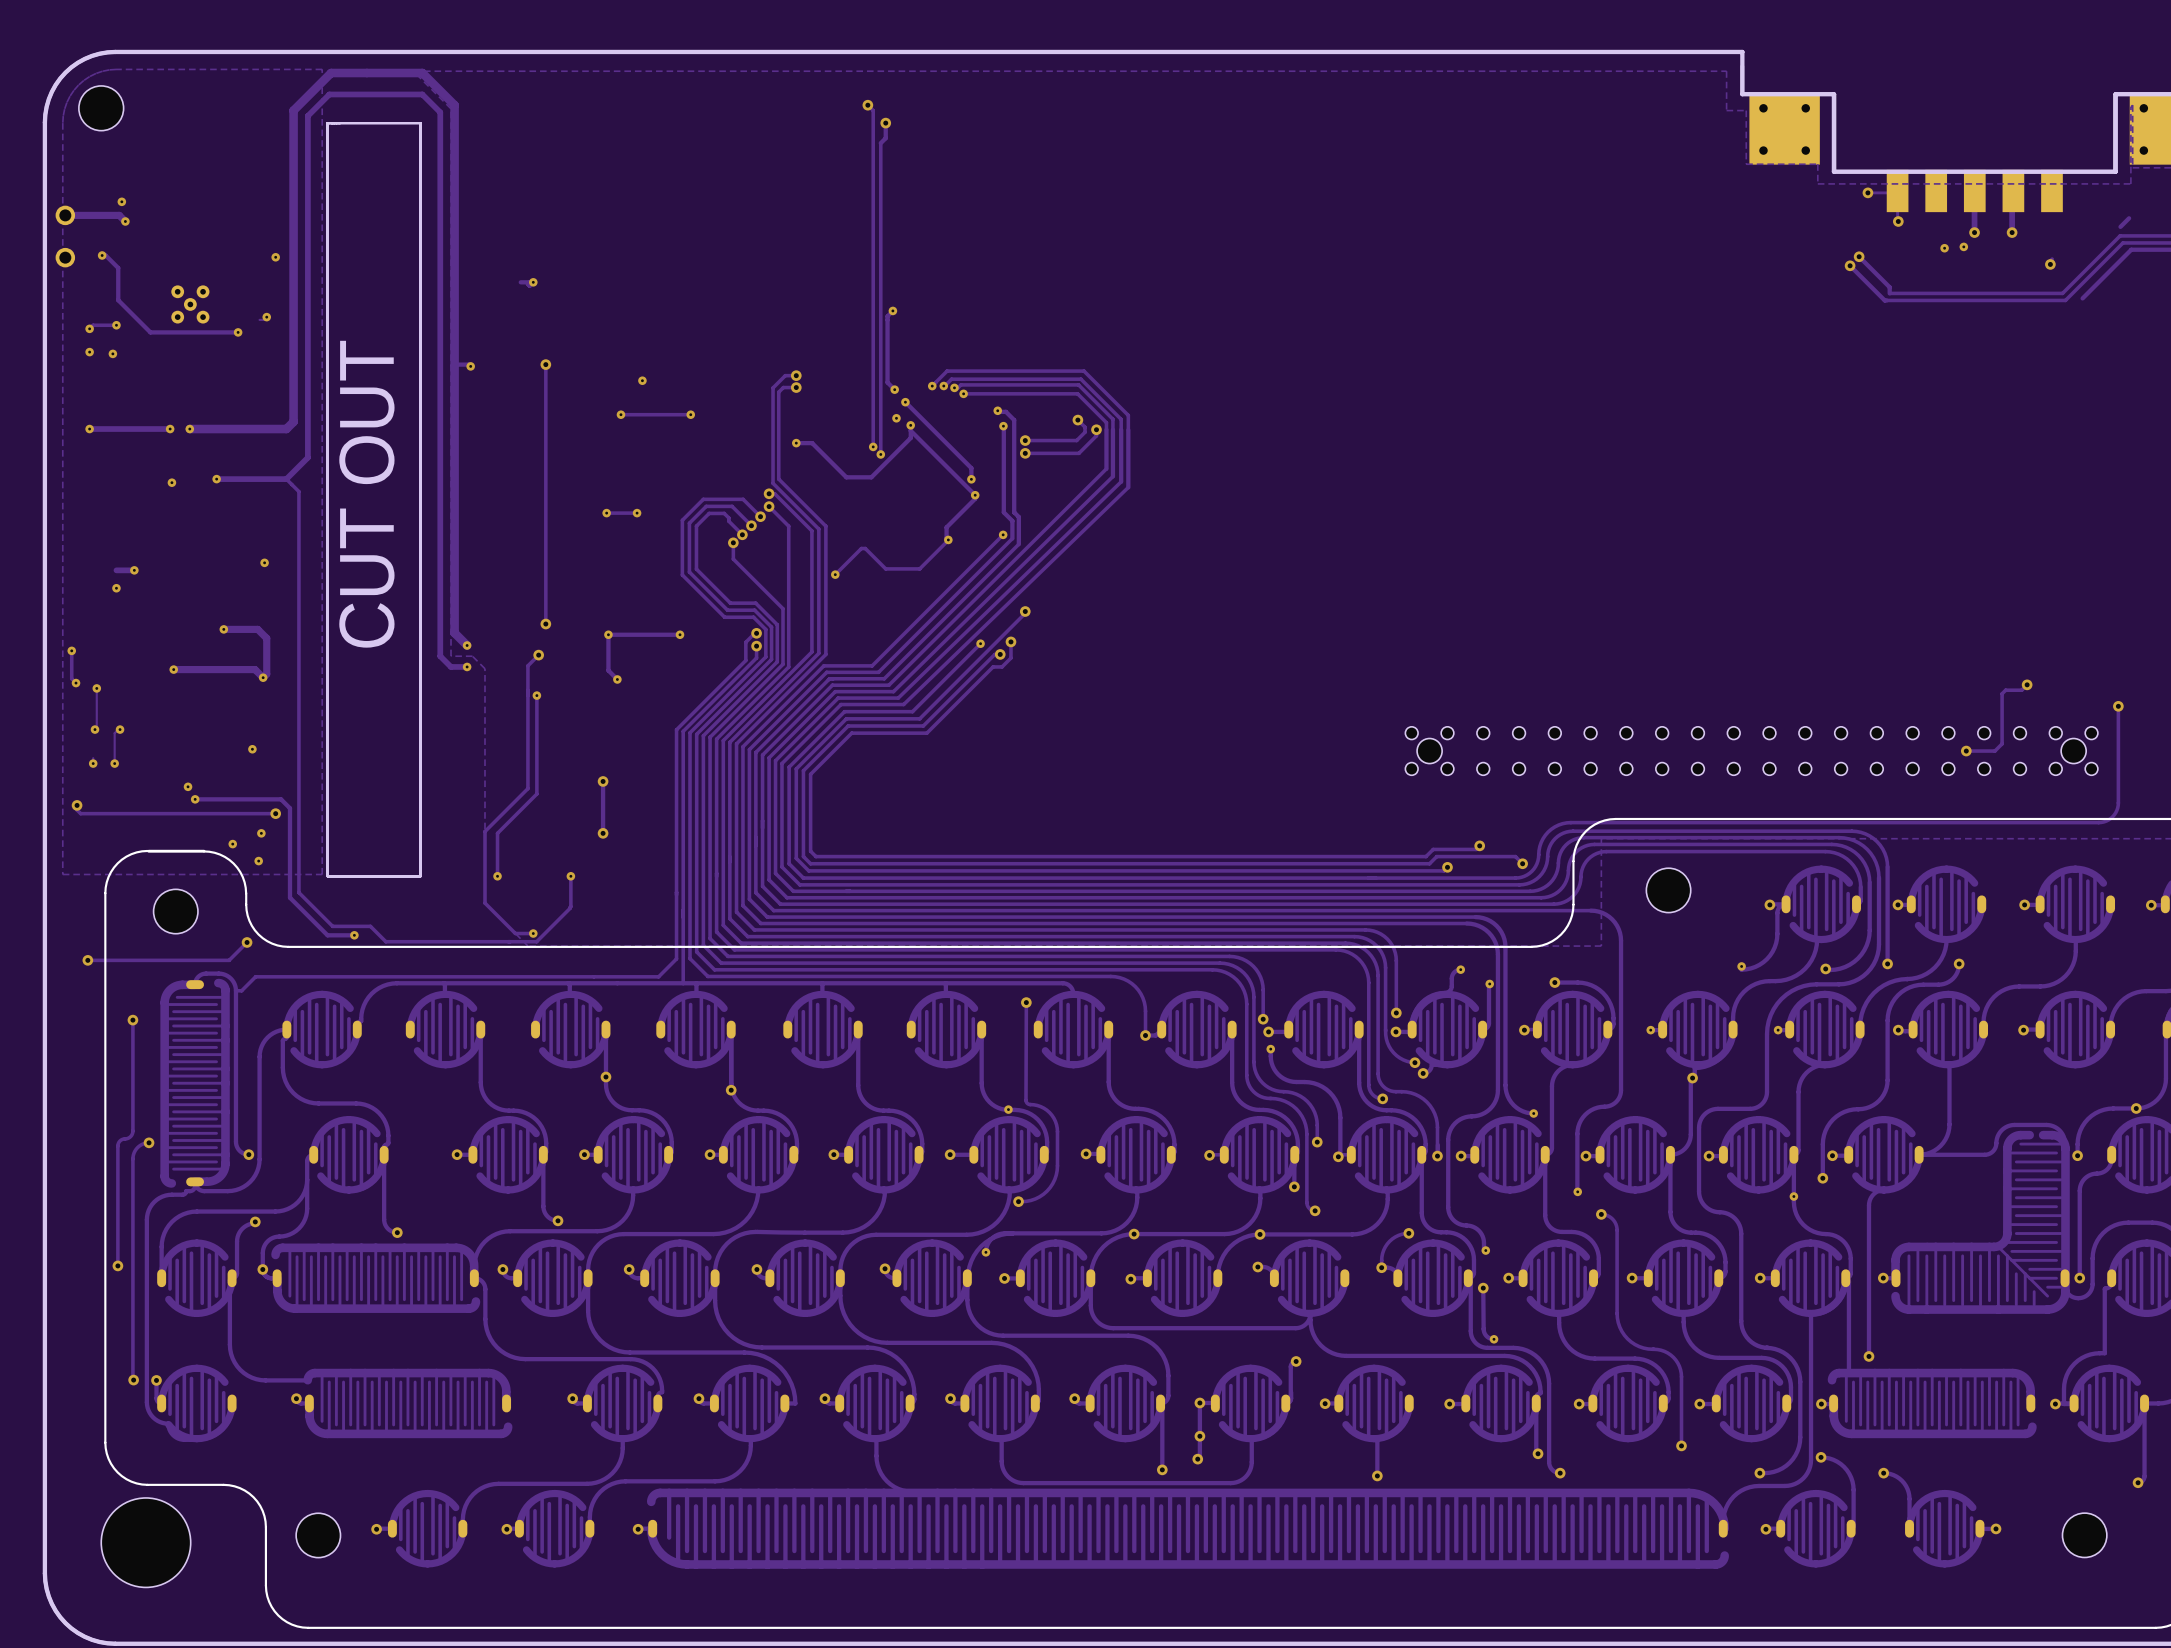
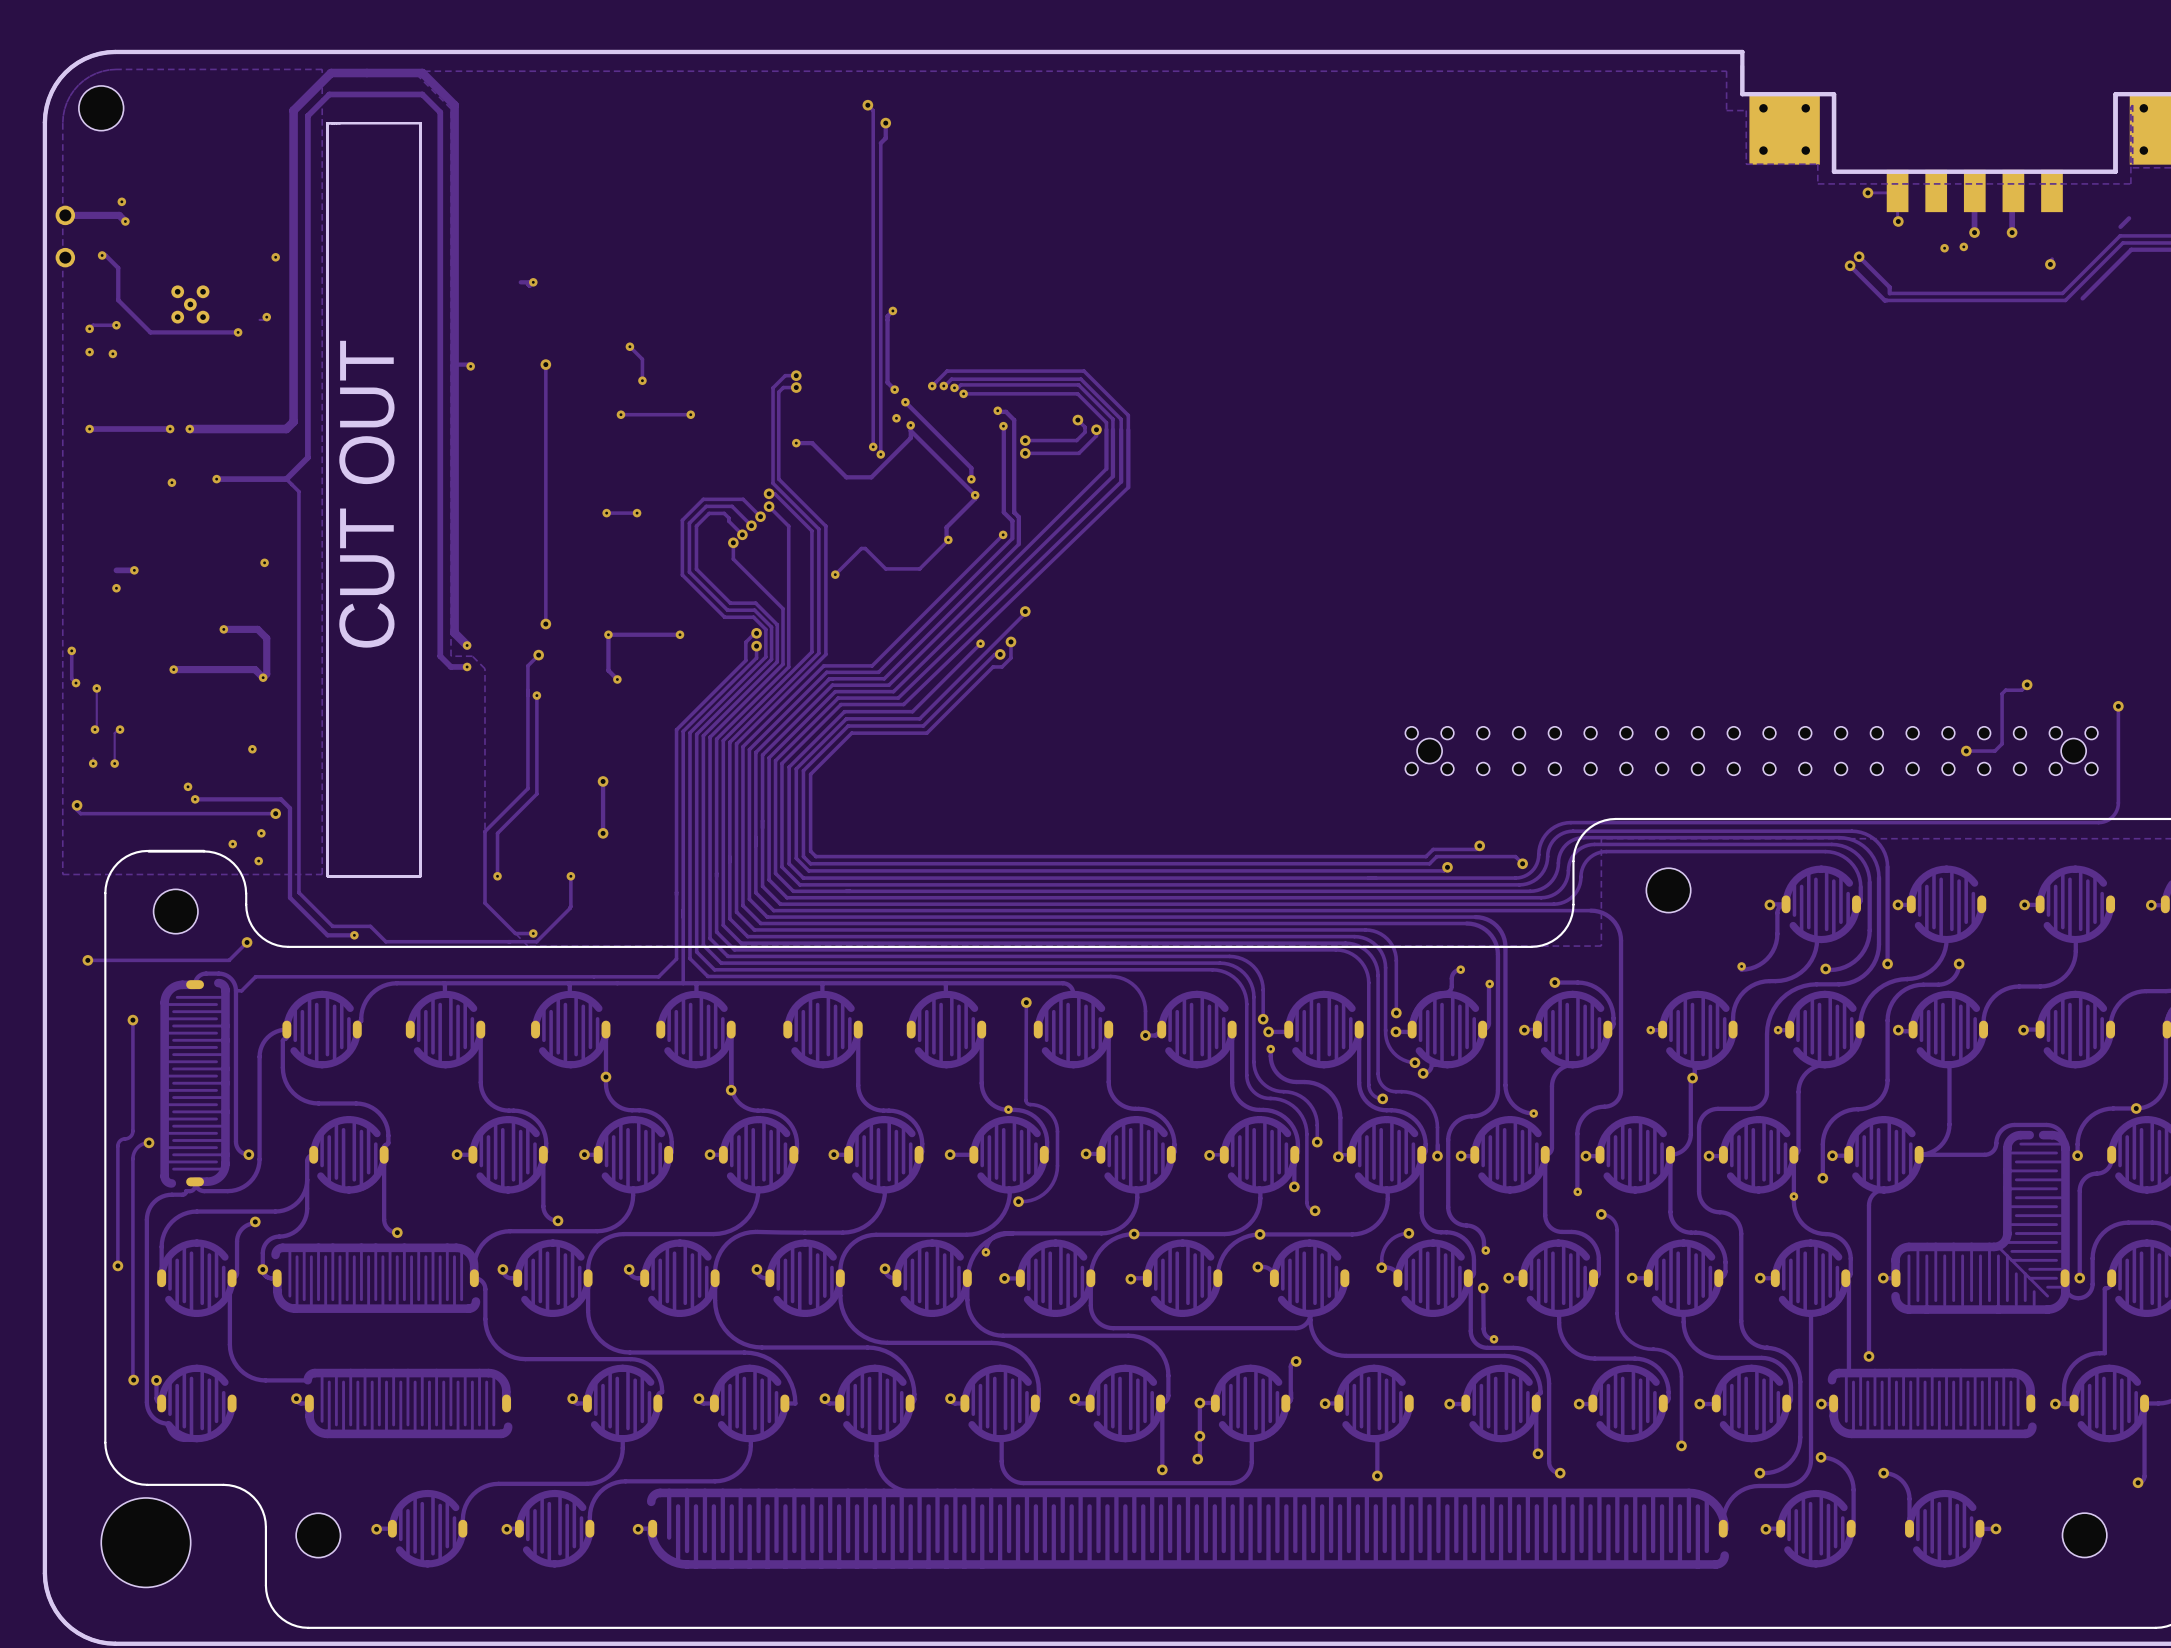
track: none -> (629, 346) (642, 359) (642, 380)
via: none -> (629, 346)

